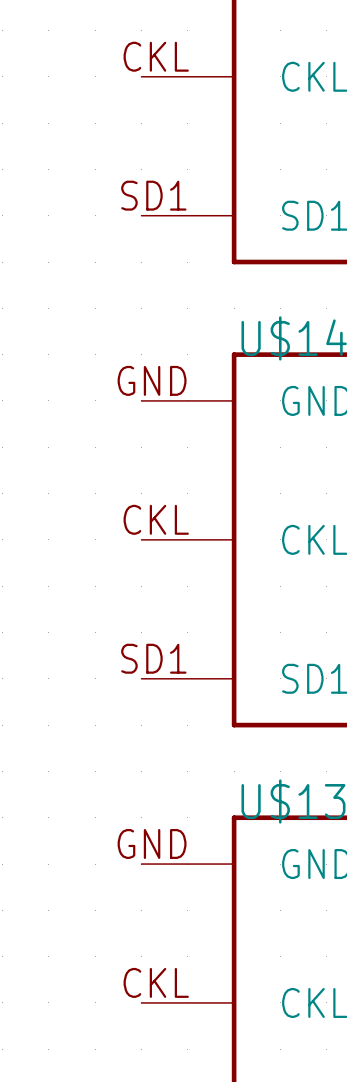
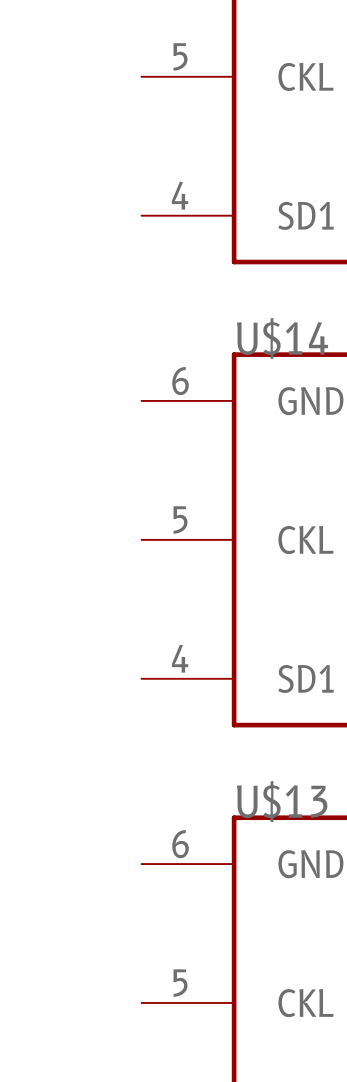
part pin number: CKL (156, 56) -> 5 (180, 56)
part pin number: SD1 (153, 195) -> 4 (180, 195)
U$14 pin number: GND (152, 380) -> 6 (180, 381)
U$14 pin number: CKL (156, 519) -> 5 (180, 520)
U$14 pin number: SD1 (153, 658) -> 4 (180, 658)
U$13 pin number: GND (152, 843) -> 6 (180, 844)
U$13 pin number: CKL (156, 982) -> 5 (180, 983)

